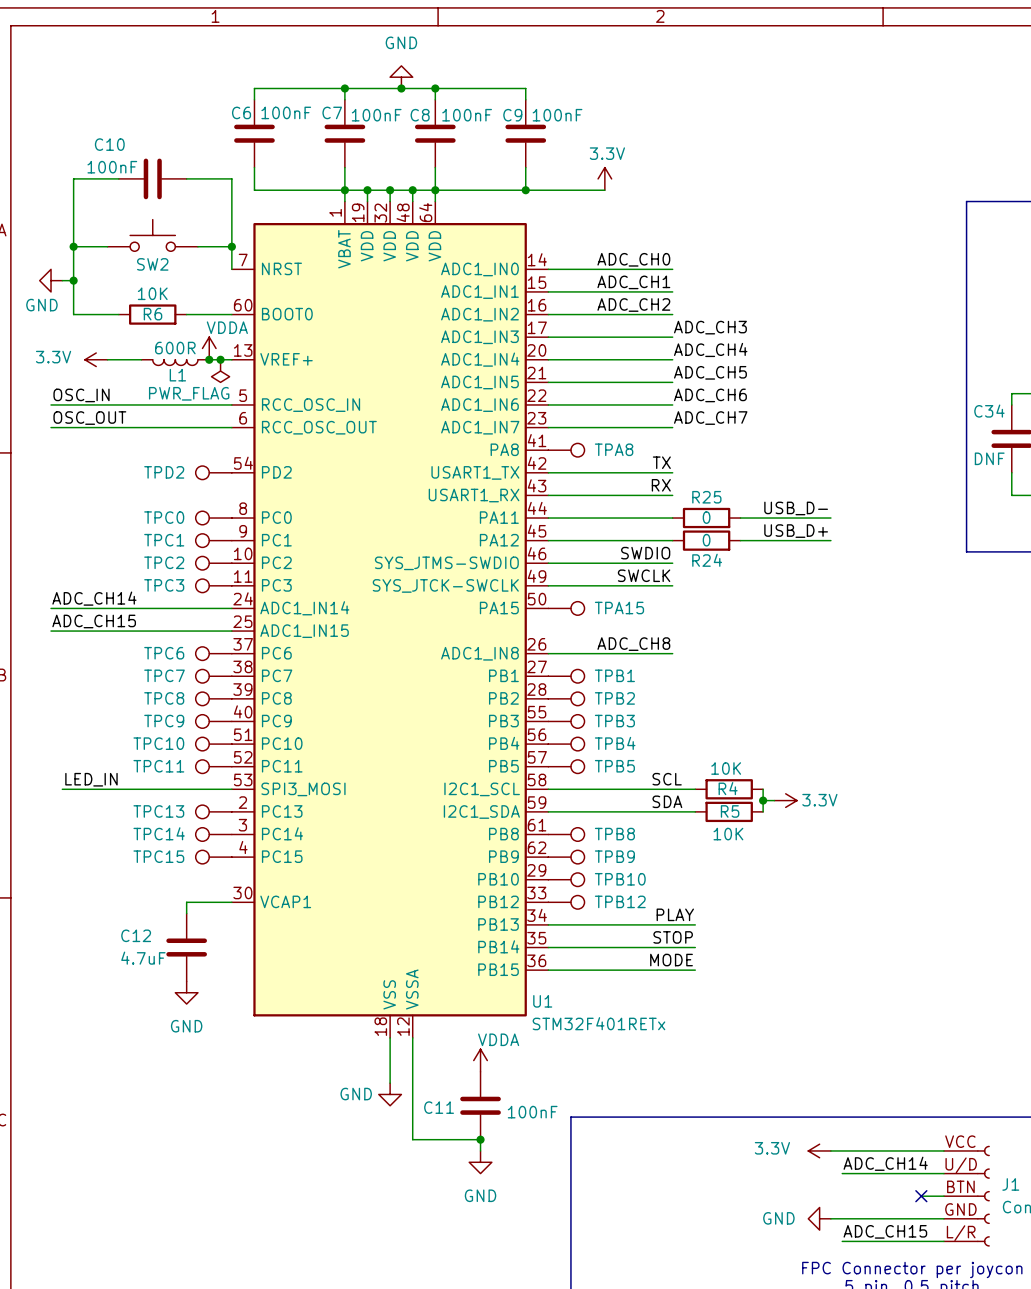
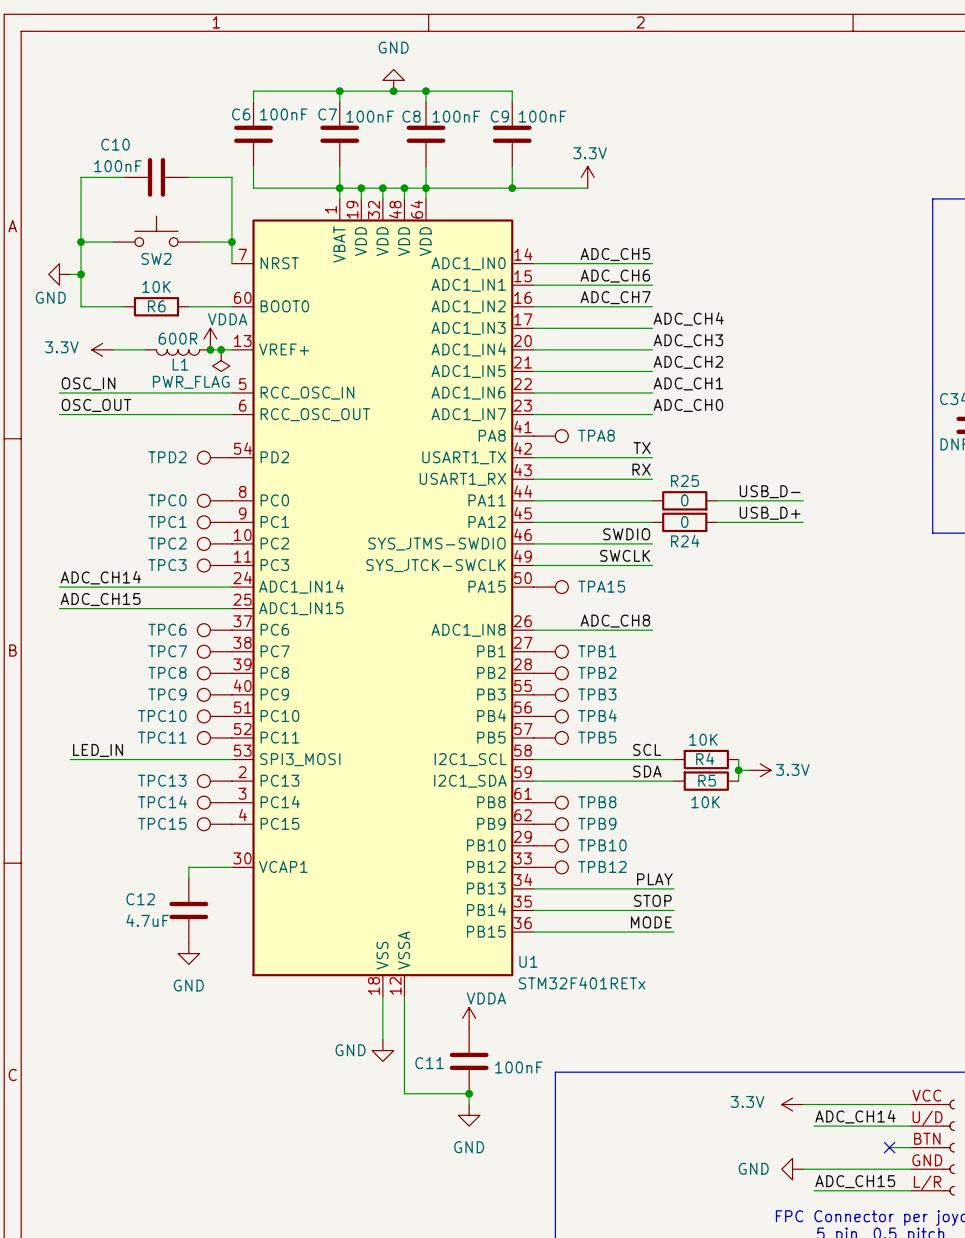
label: ADC_CH0 (633, 259) -> ADC_CH5 (615, 254)
label: ADC_CH1 (633, 282) -> ADC_CH6 (615, 276)
label: ADC_CH2 (633, 305) -> ADC_CH7 (615, 297)
label: ADC_CH3 (710, 327) -> ADC_CH4 (688, 318)
label: ADC_CH4 (710, 349) -> ADC_CH3 (688, 340)
label: ADC_CH5 (710, 372) -> ADC_CH2 (688, 362)
label: ADC_CH6 (710, 395) -> ADC_CH1 (688, 383)
label: ADC_CH7 (710, 418) -> ADC_CH0 (688, 405)

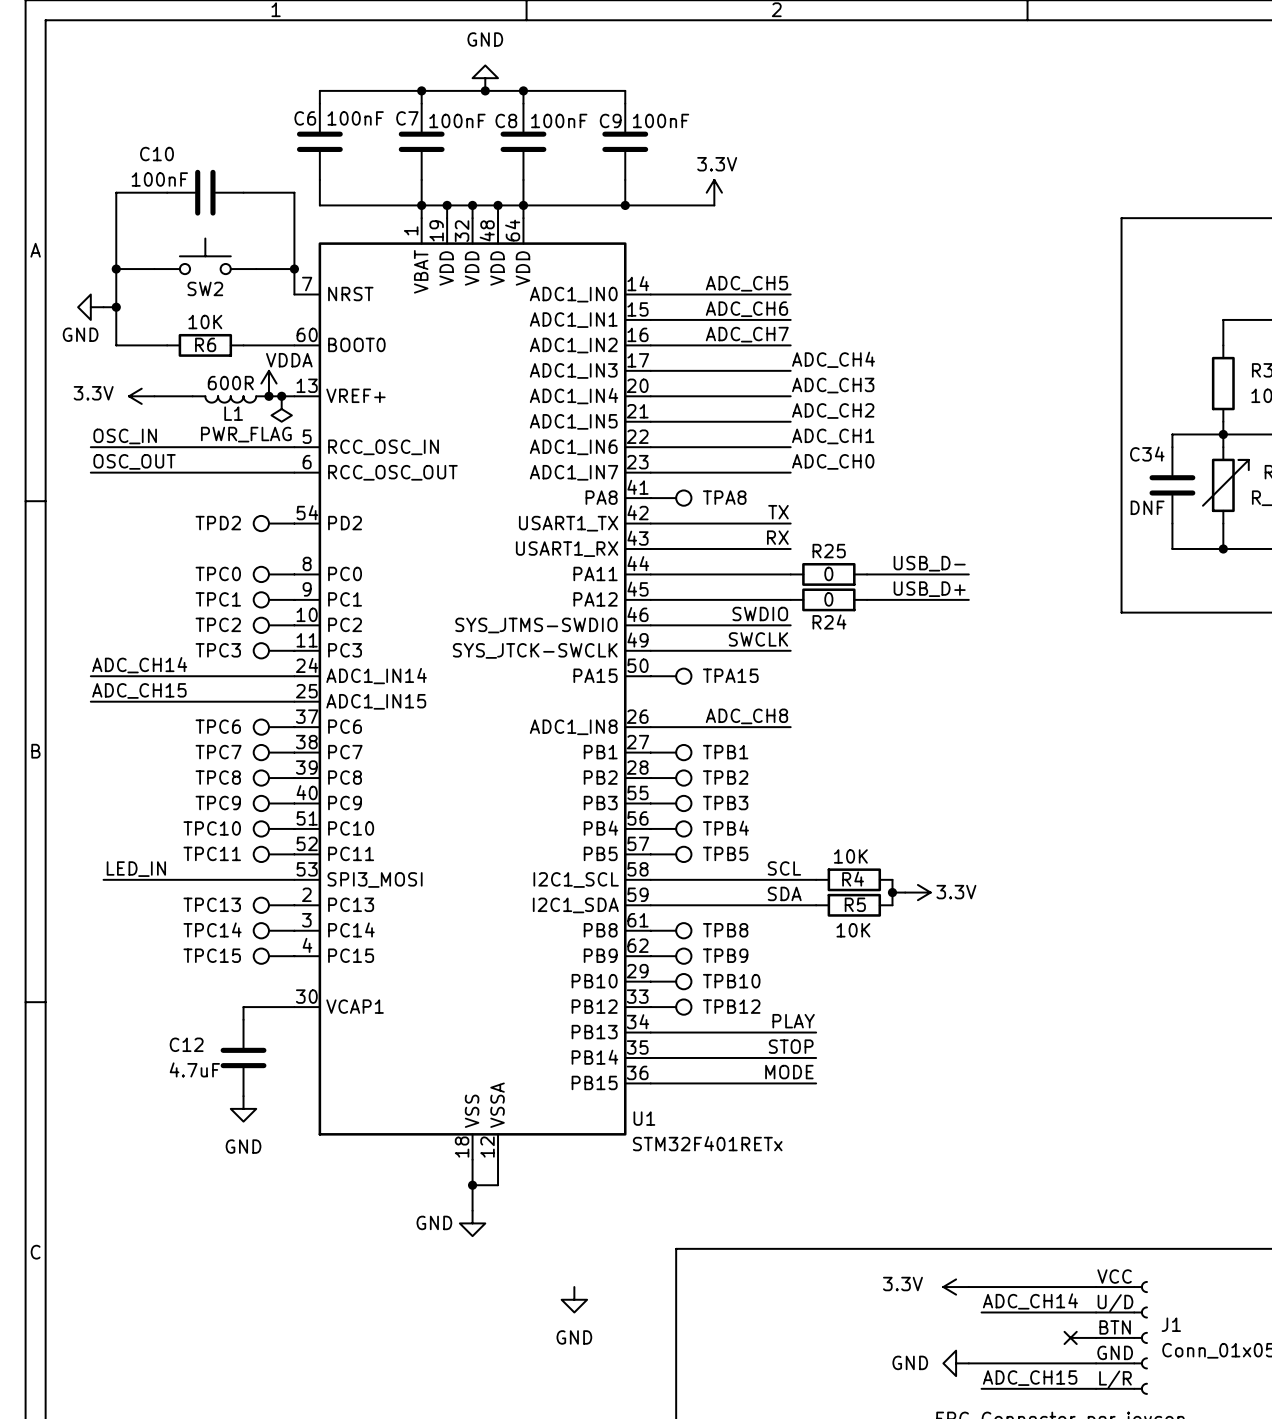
junction: none -> (472, 1185)
wire: (404, 1018) (404, 1093) (469, 1093) (469, 1104) -> (498, 1185) (472, 1185)
power symbol: VDDA (469, 1018) -> none
C11: 100nF (469, 1061) -> none
junction: (469, 1093) -> none

